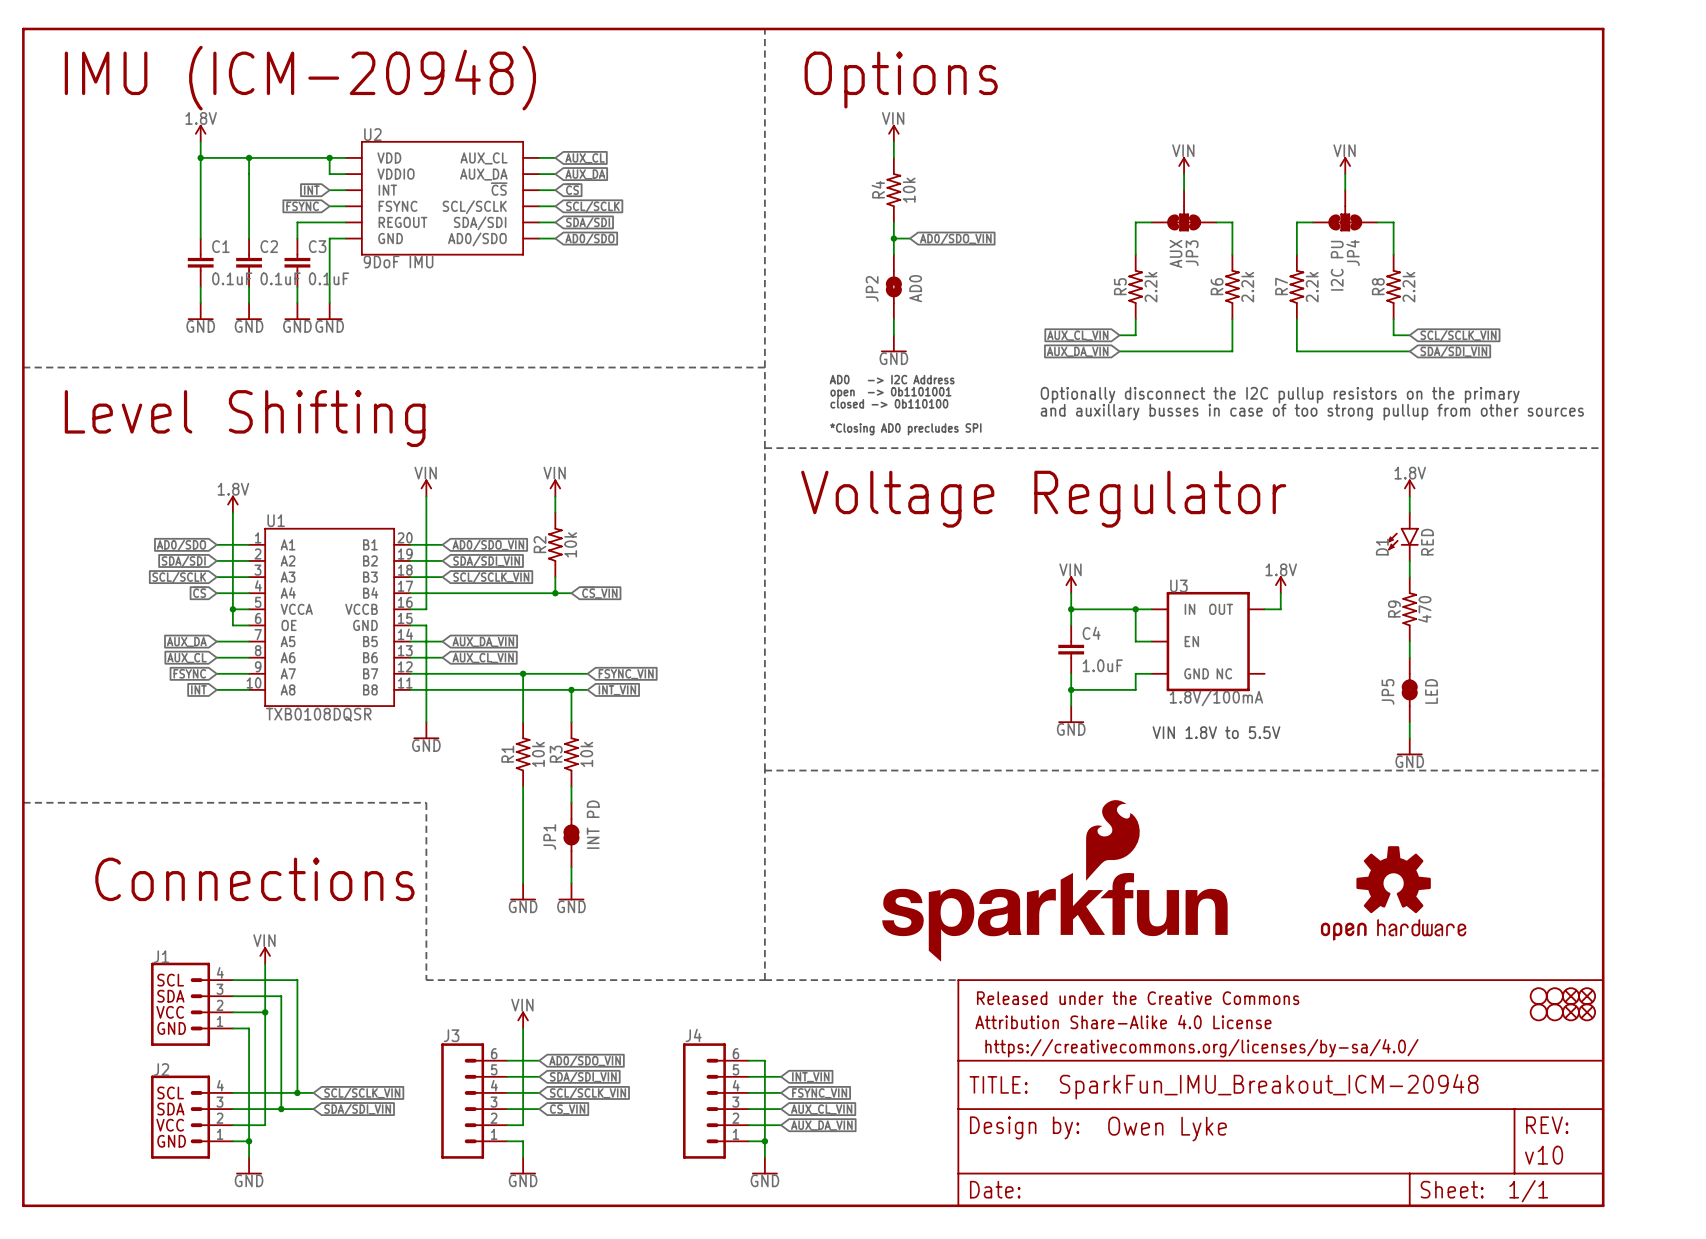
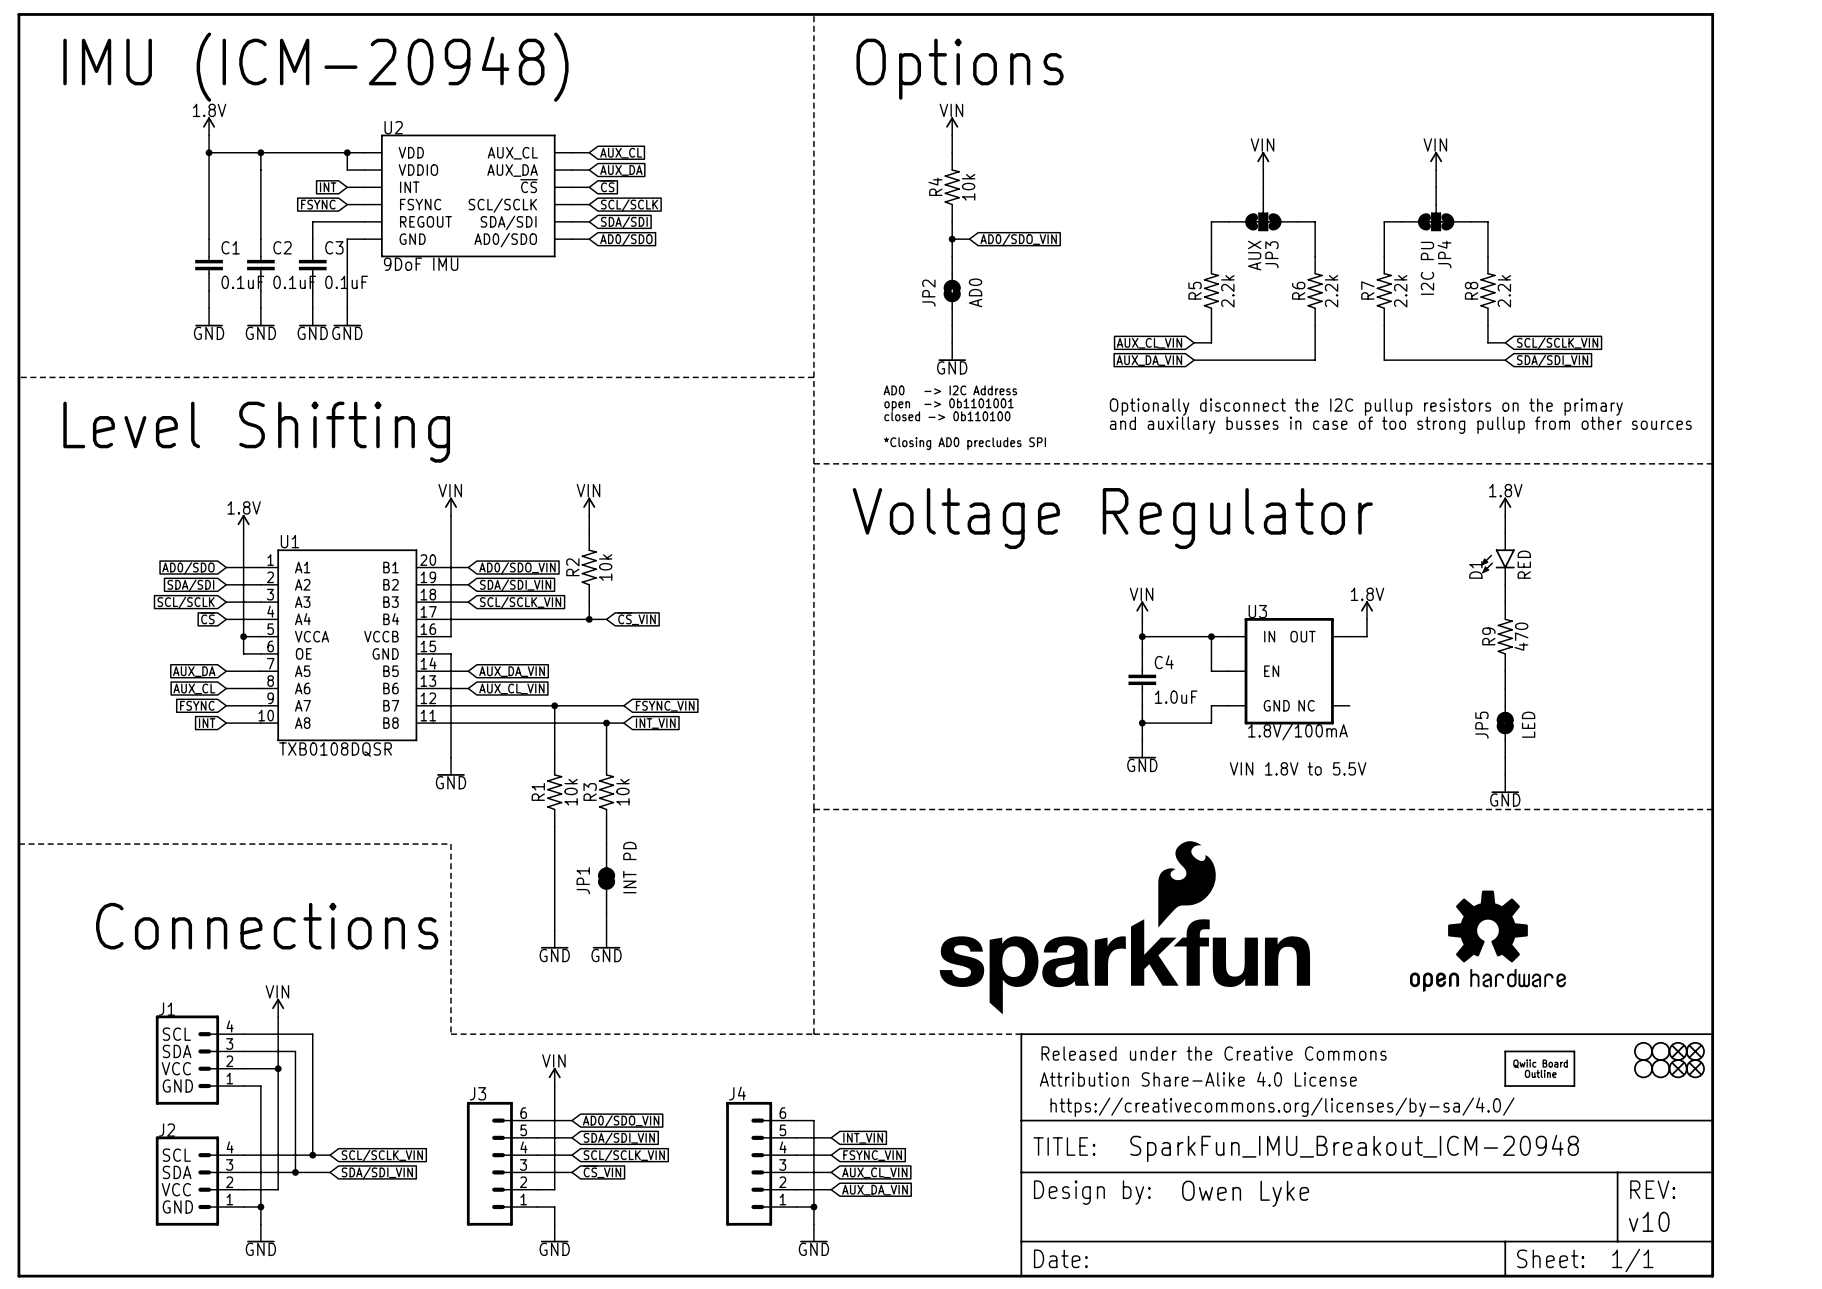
part: none -> (1539, 1068)

